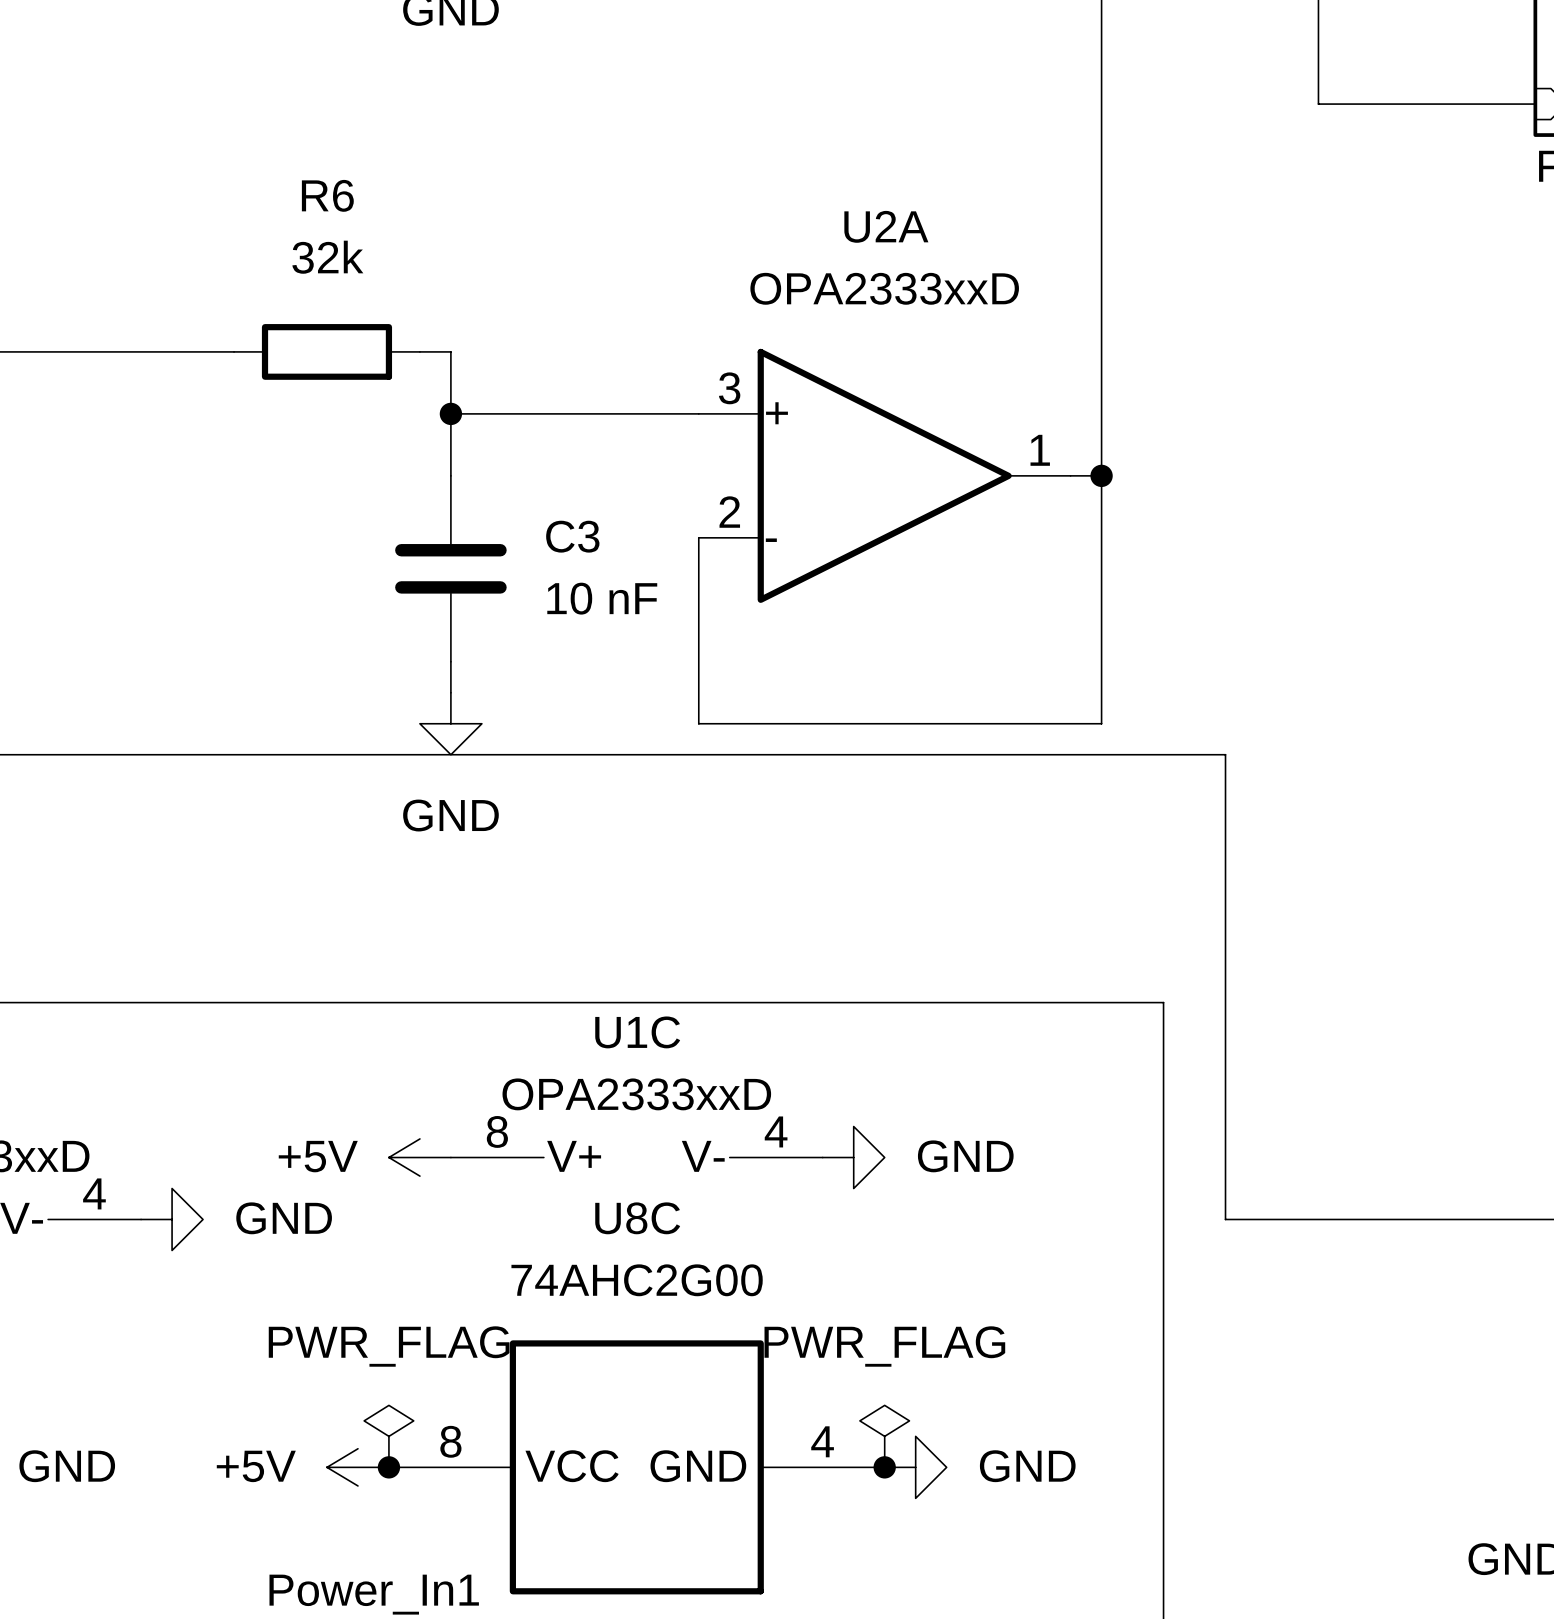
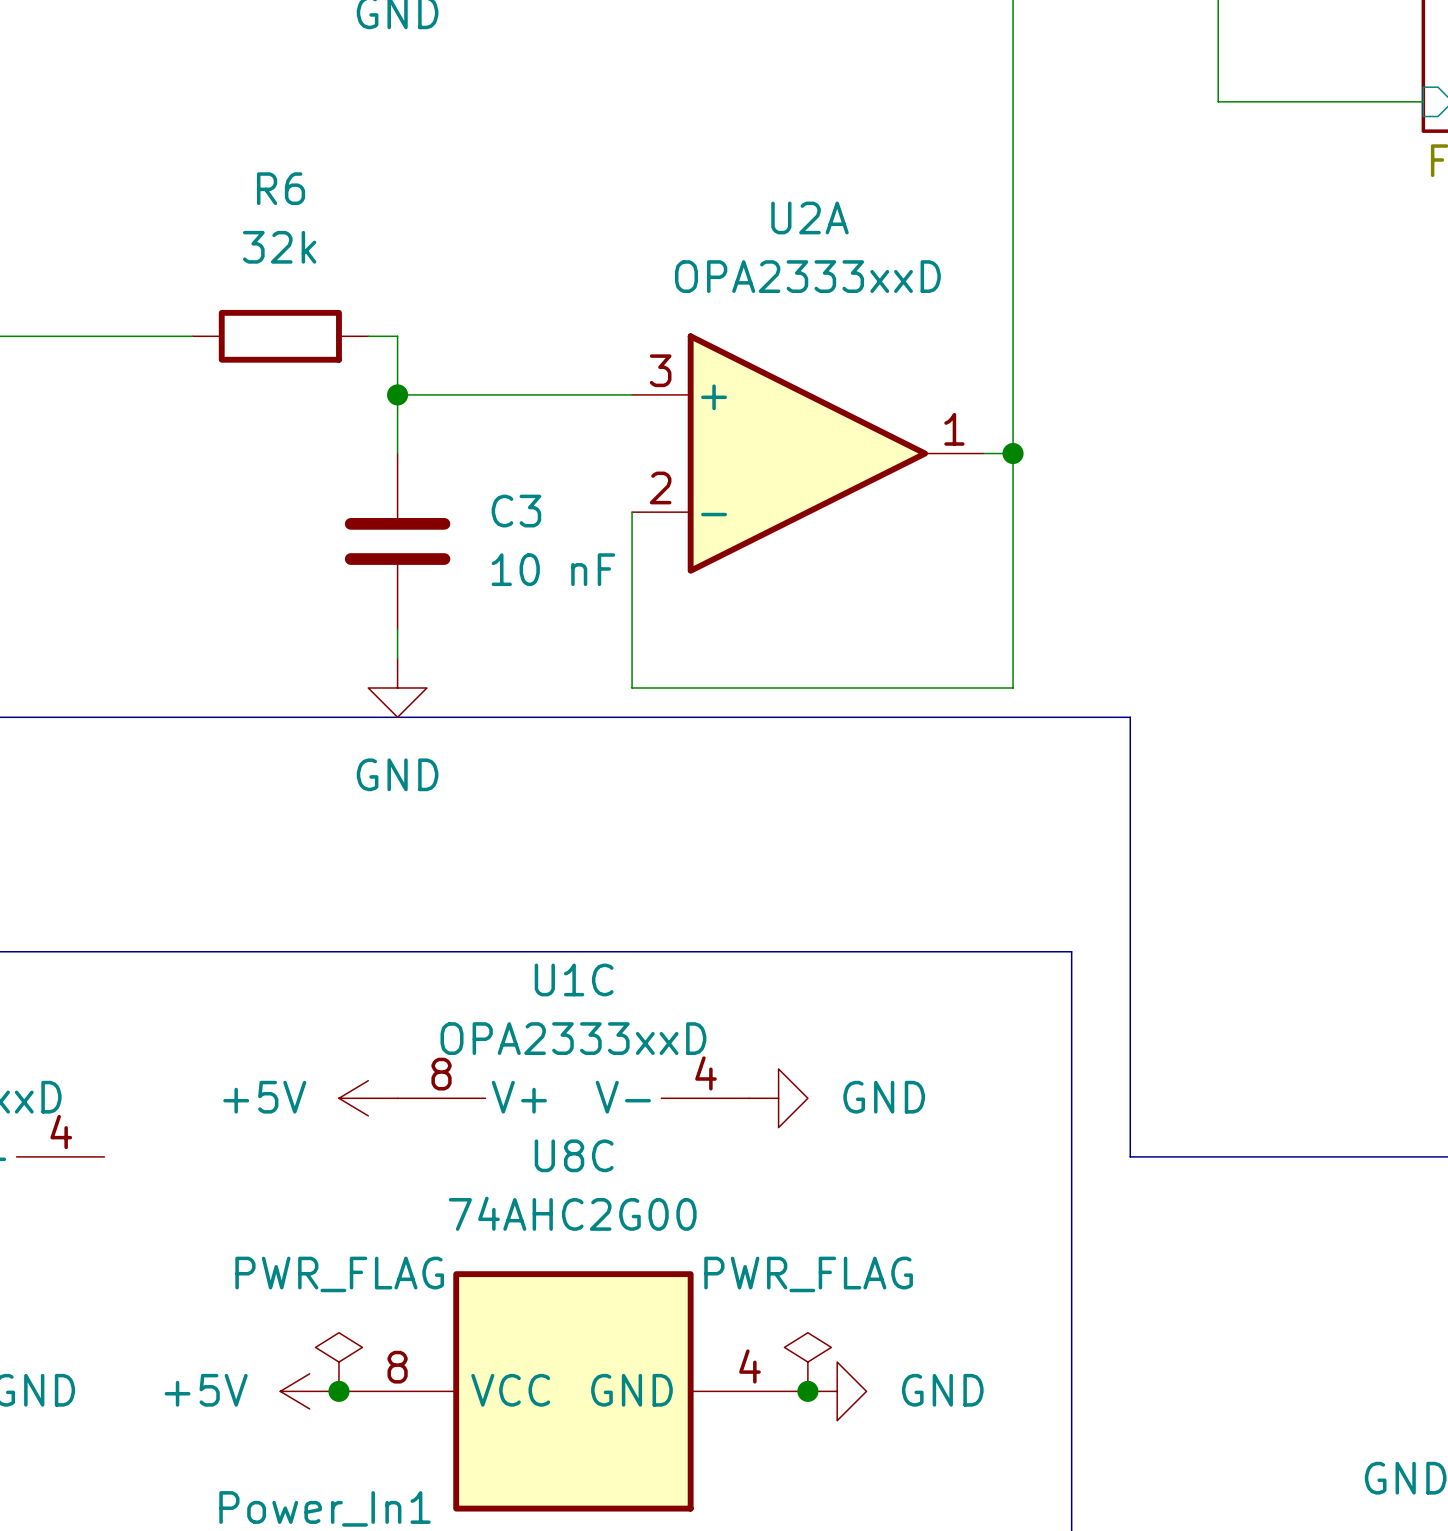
power symbol: GND (172, 1219) -> none

